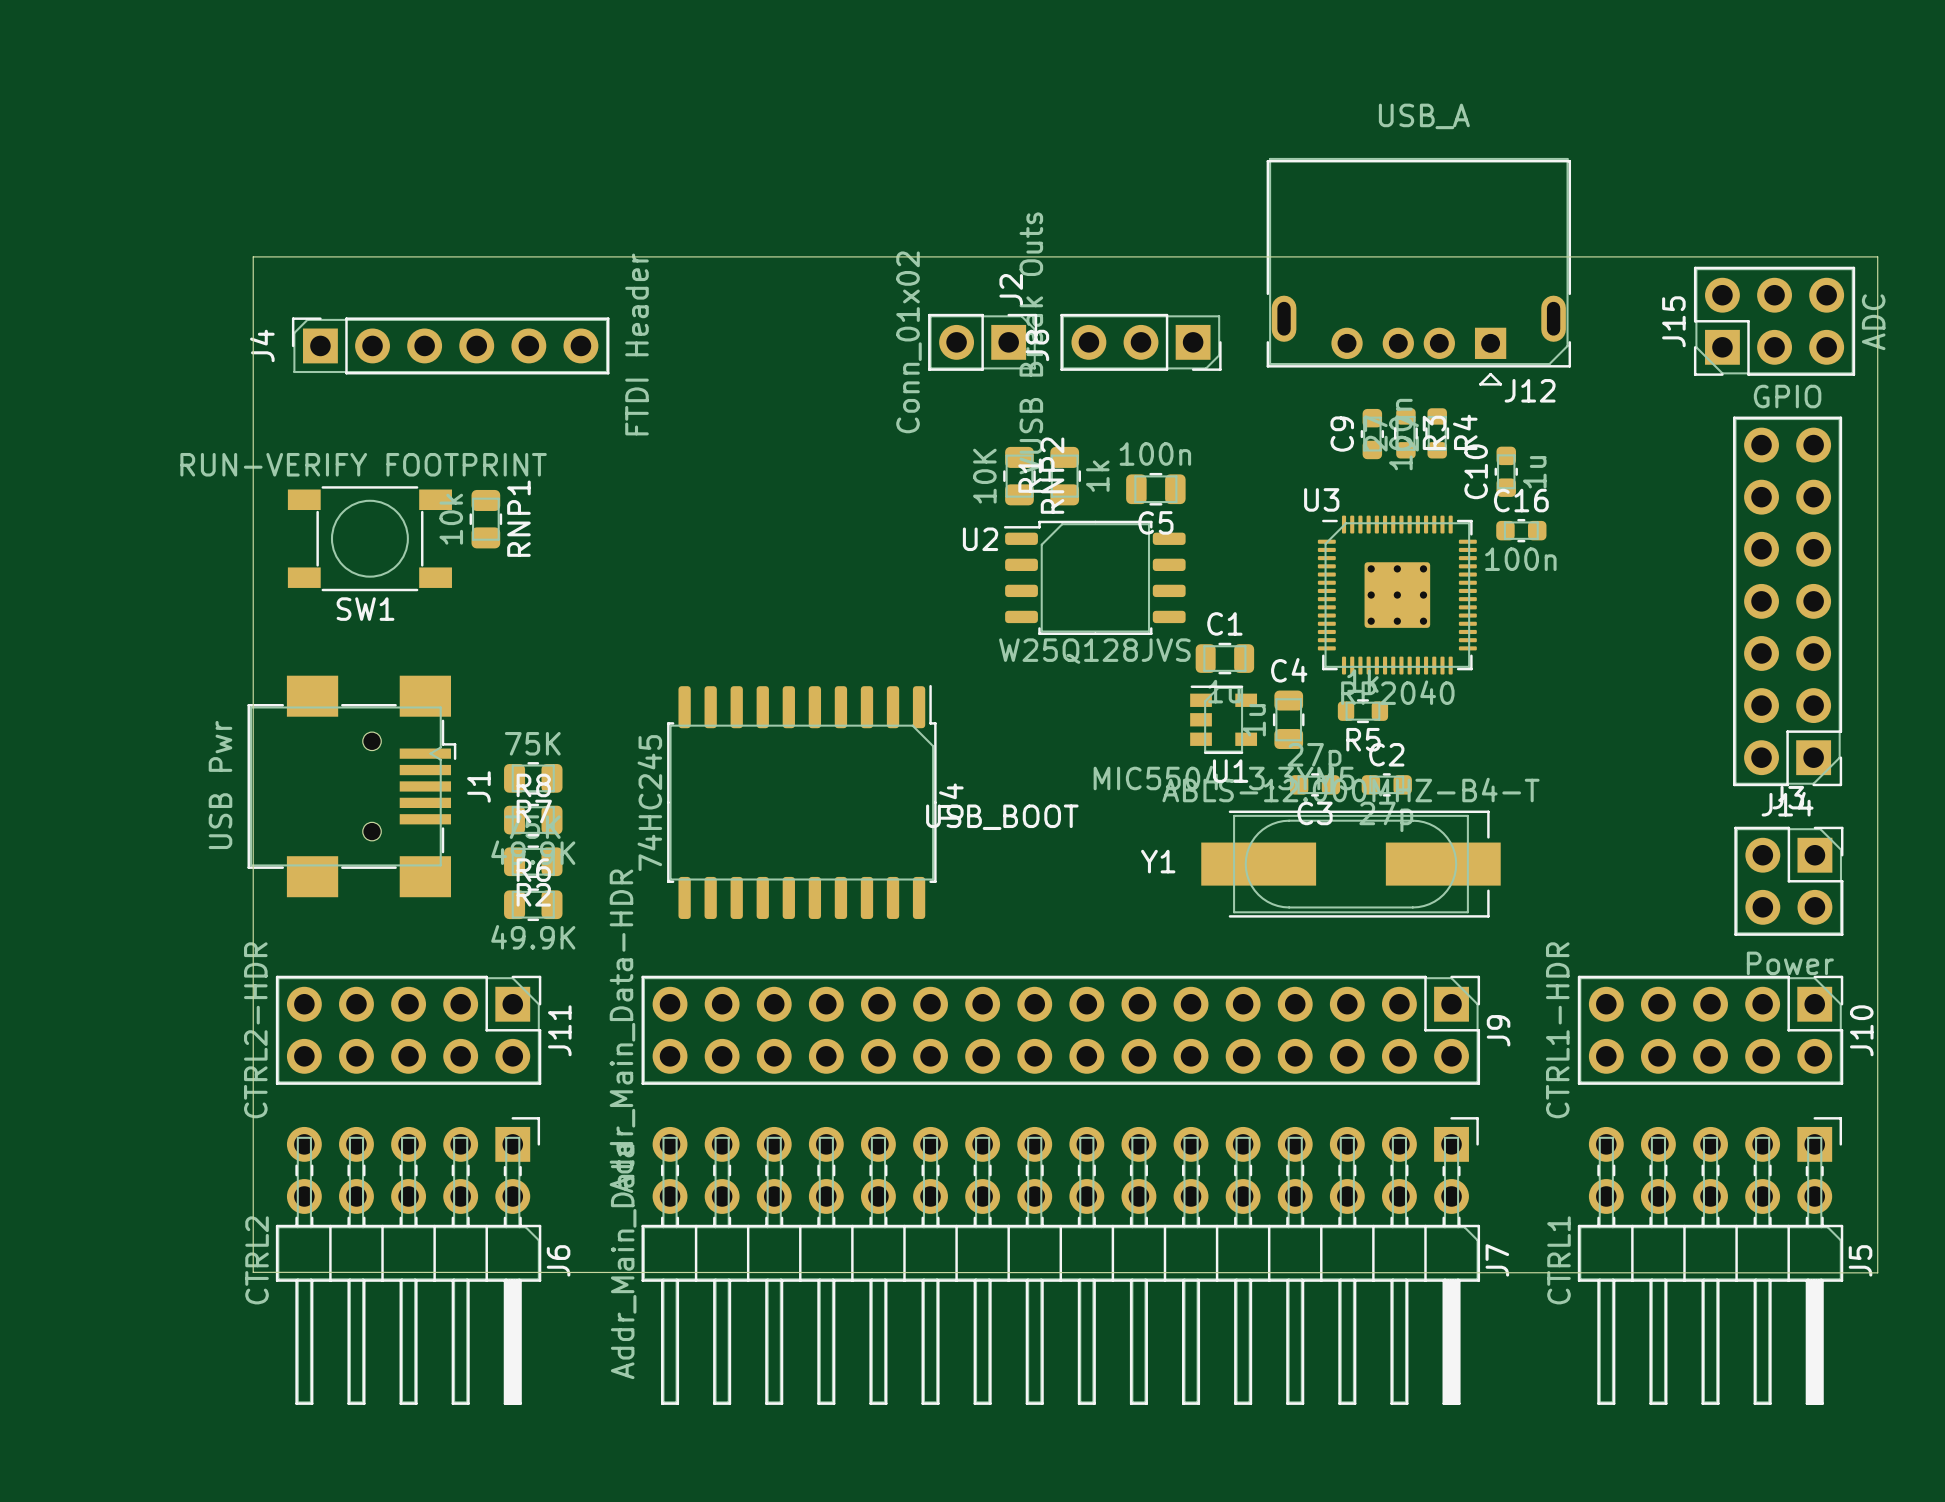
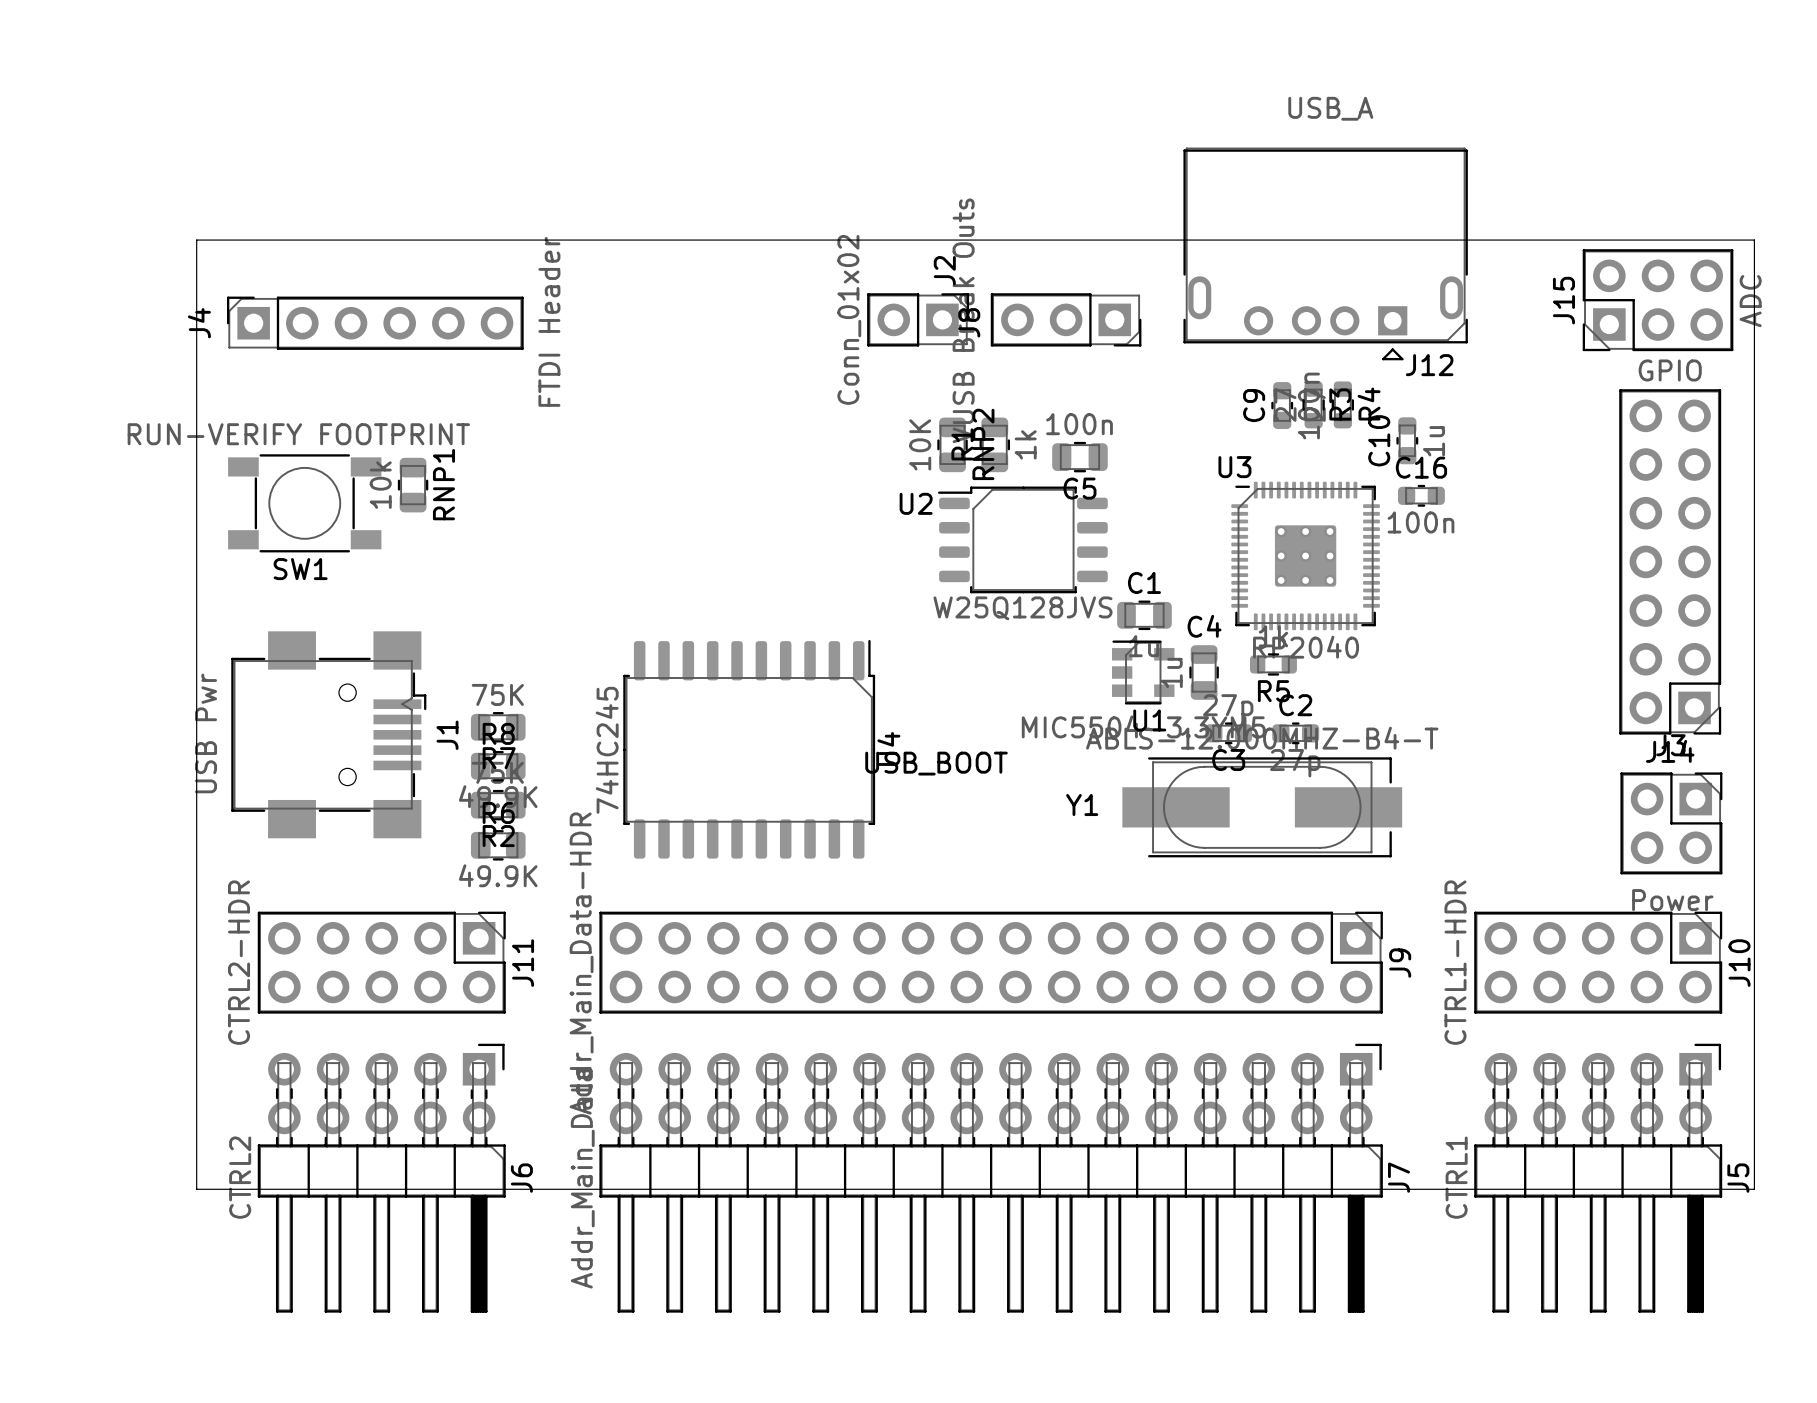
board edge: (253, 256) (253, 1272) (1877, 1272) -> (236, 240) (196, 240) (196, 1189) (1754, 1189)
J4 position: (450, 345) -> (375, 323)
RNP1 position: (485, 519) -> (413, 485)
SW1 position: (369, 538) -> (304, 503)

